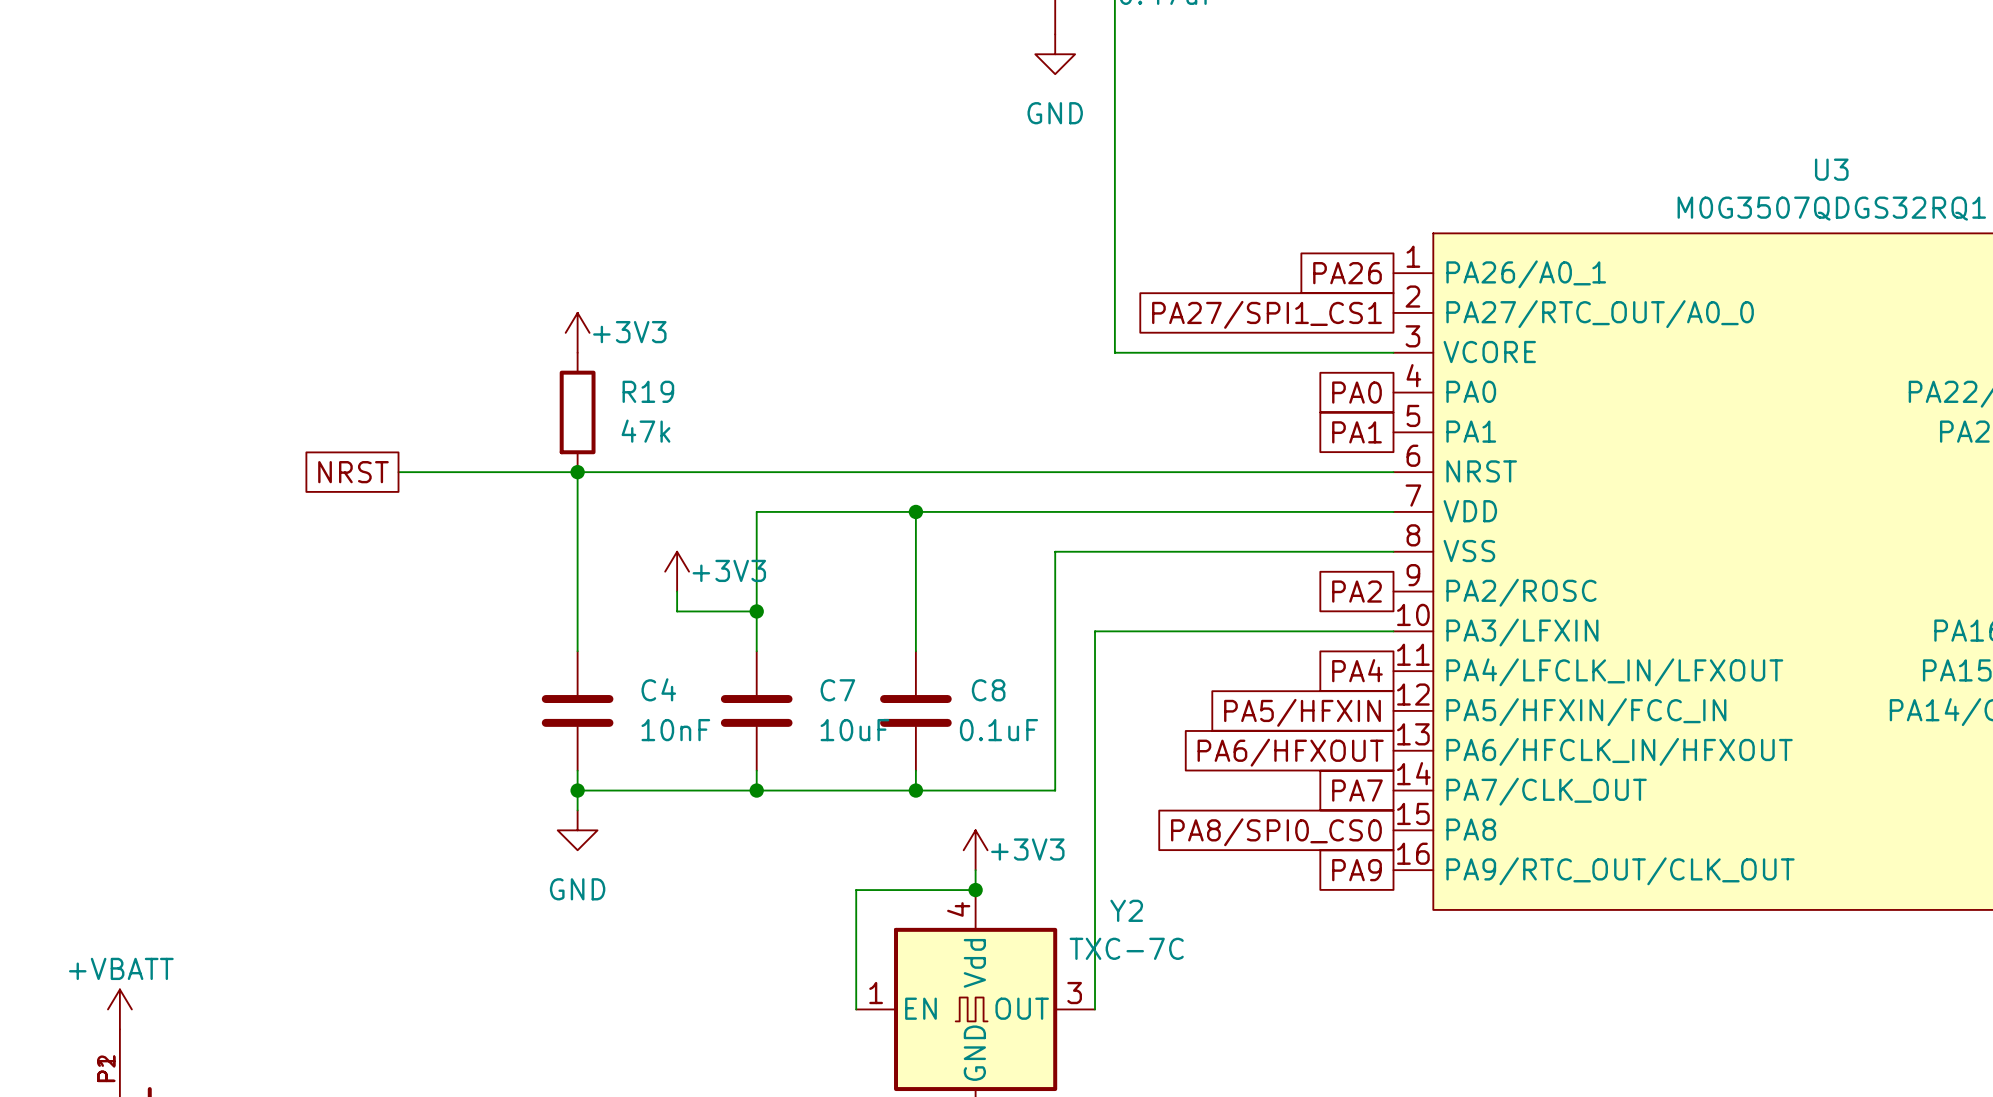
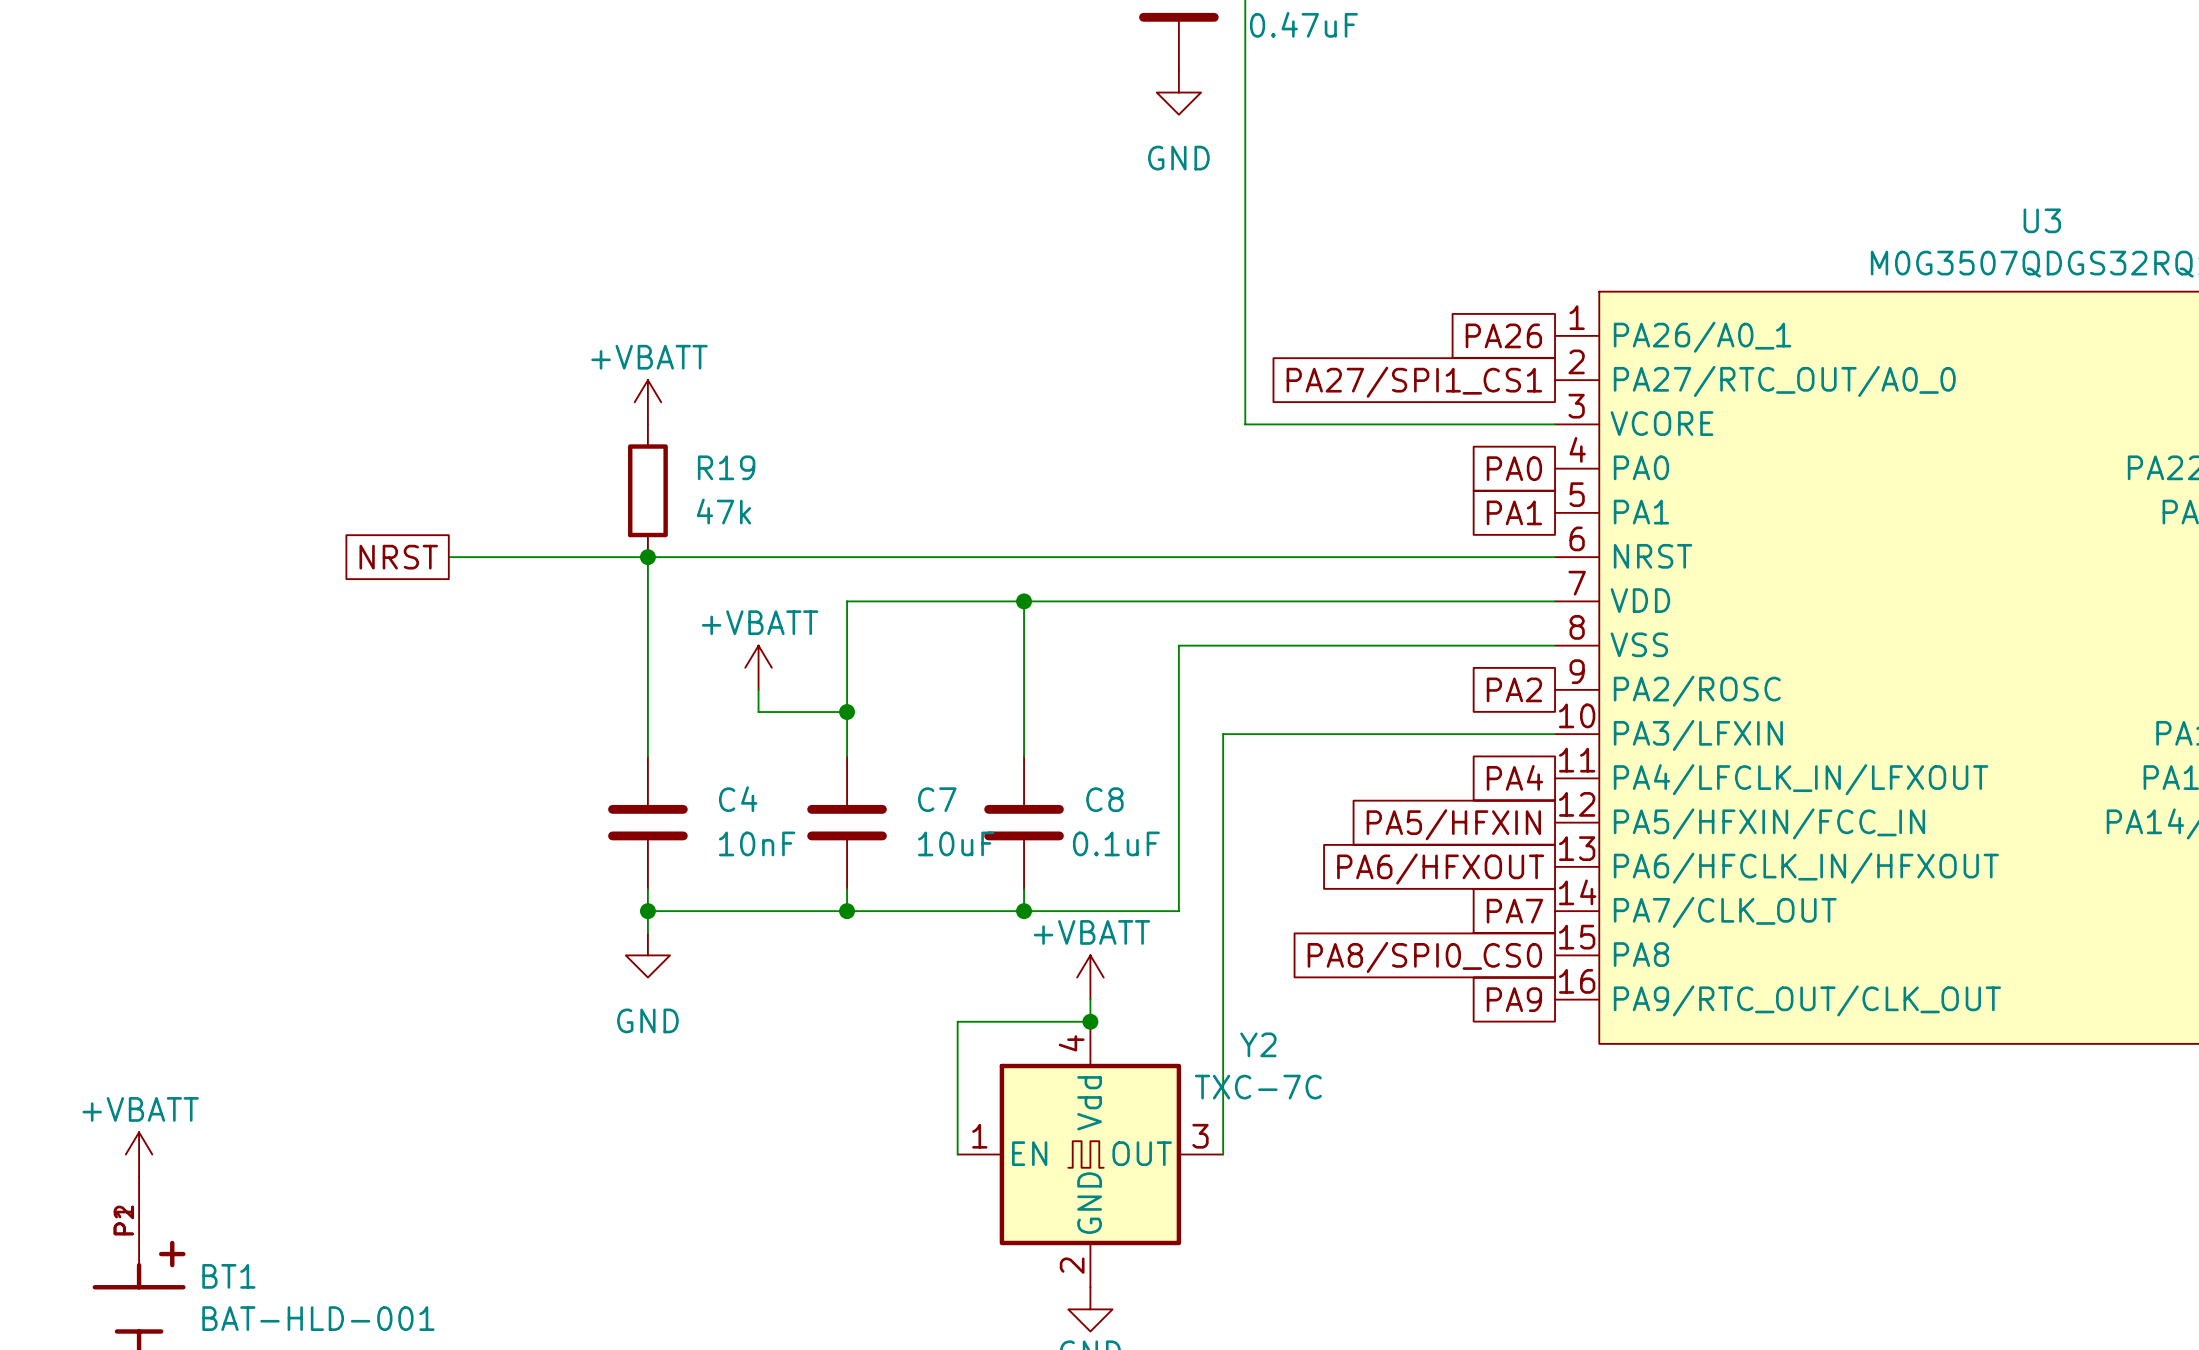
power symbol: +3V3 (577, 332) -> +VBATT (647, 402)
power symbol: +3V3 (677, 571) -> +VBATT (758, 667)
power symbol: +3V3 (975, 850) -> +VBATT (1090, 977)

